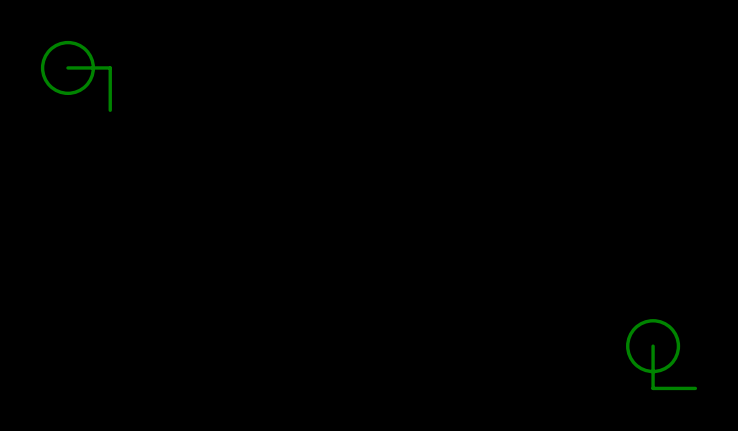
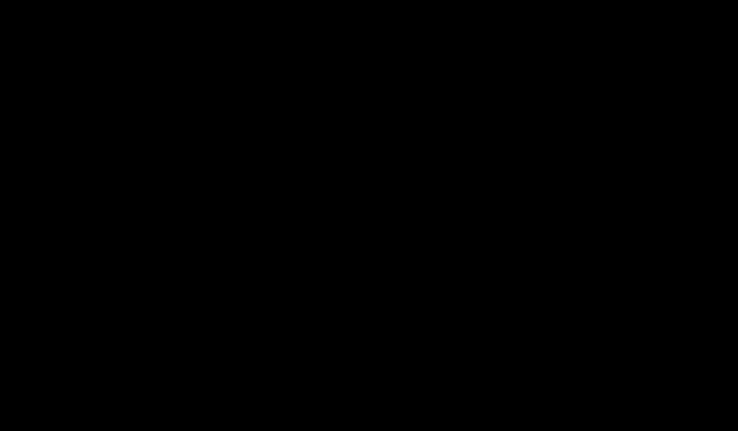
drawing: [40, 40, 96, 96] -> none
bottom track: (67, 67) (110, 67) (110, 110) -> none
drawing: [626, 319, 681, 374] -> none
bottom track: (653, 346) (653, 388) (695, 388) -> none

